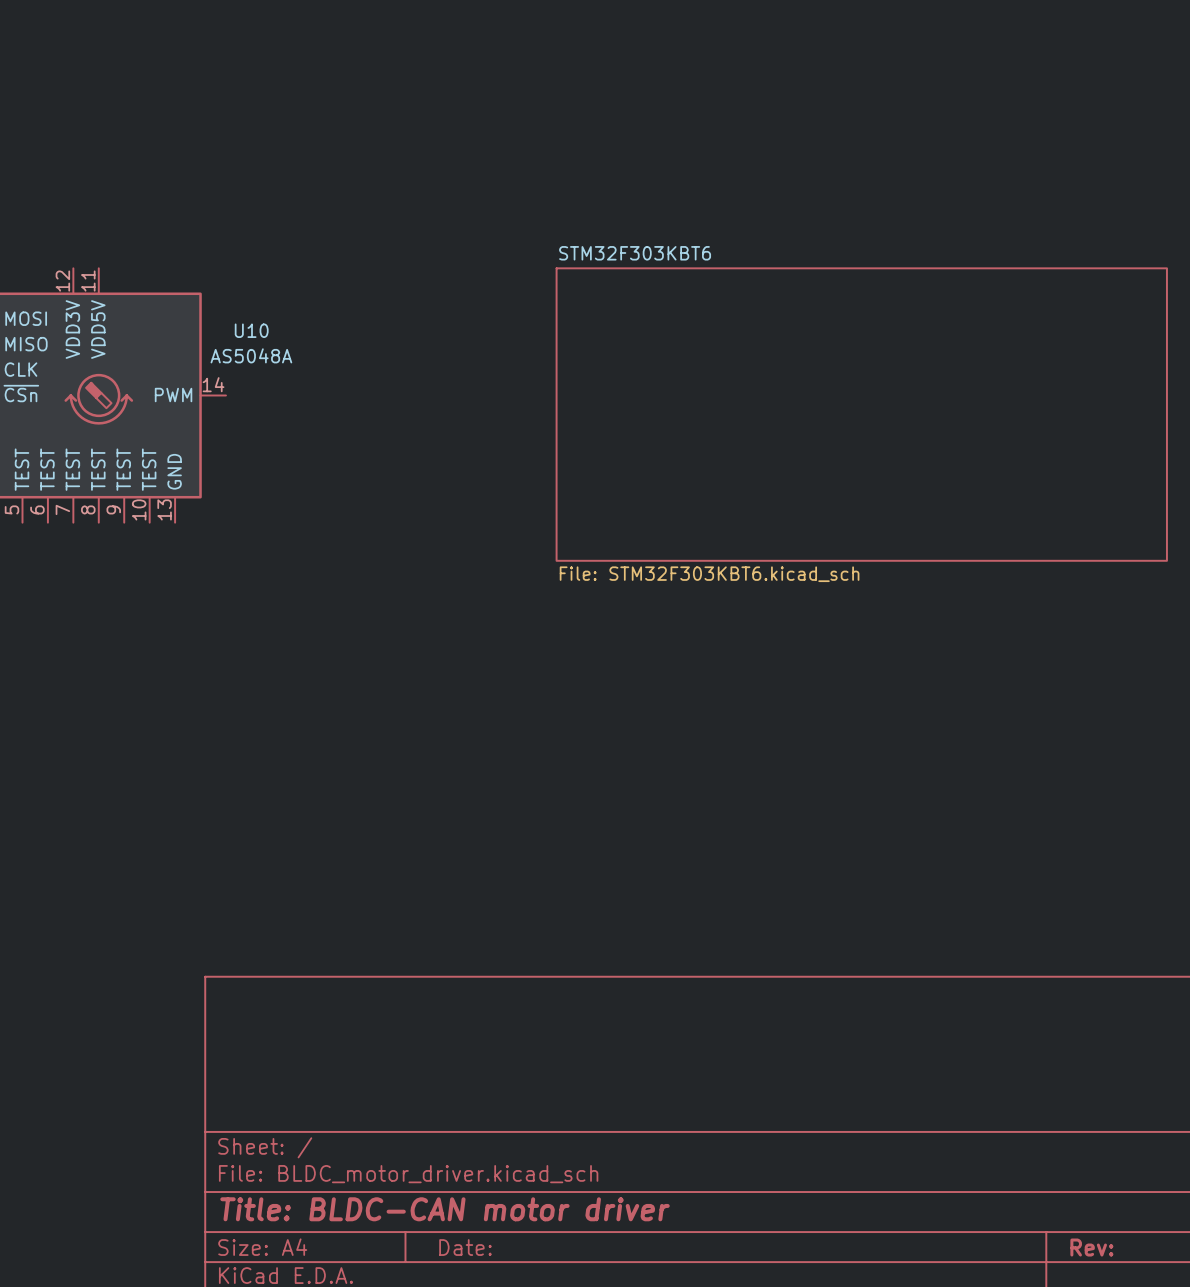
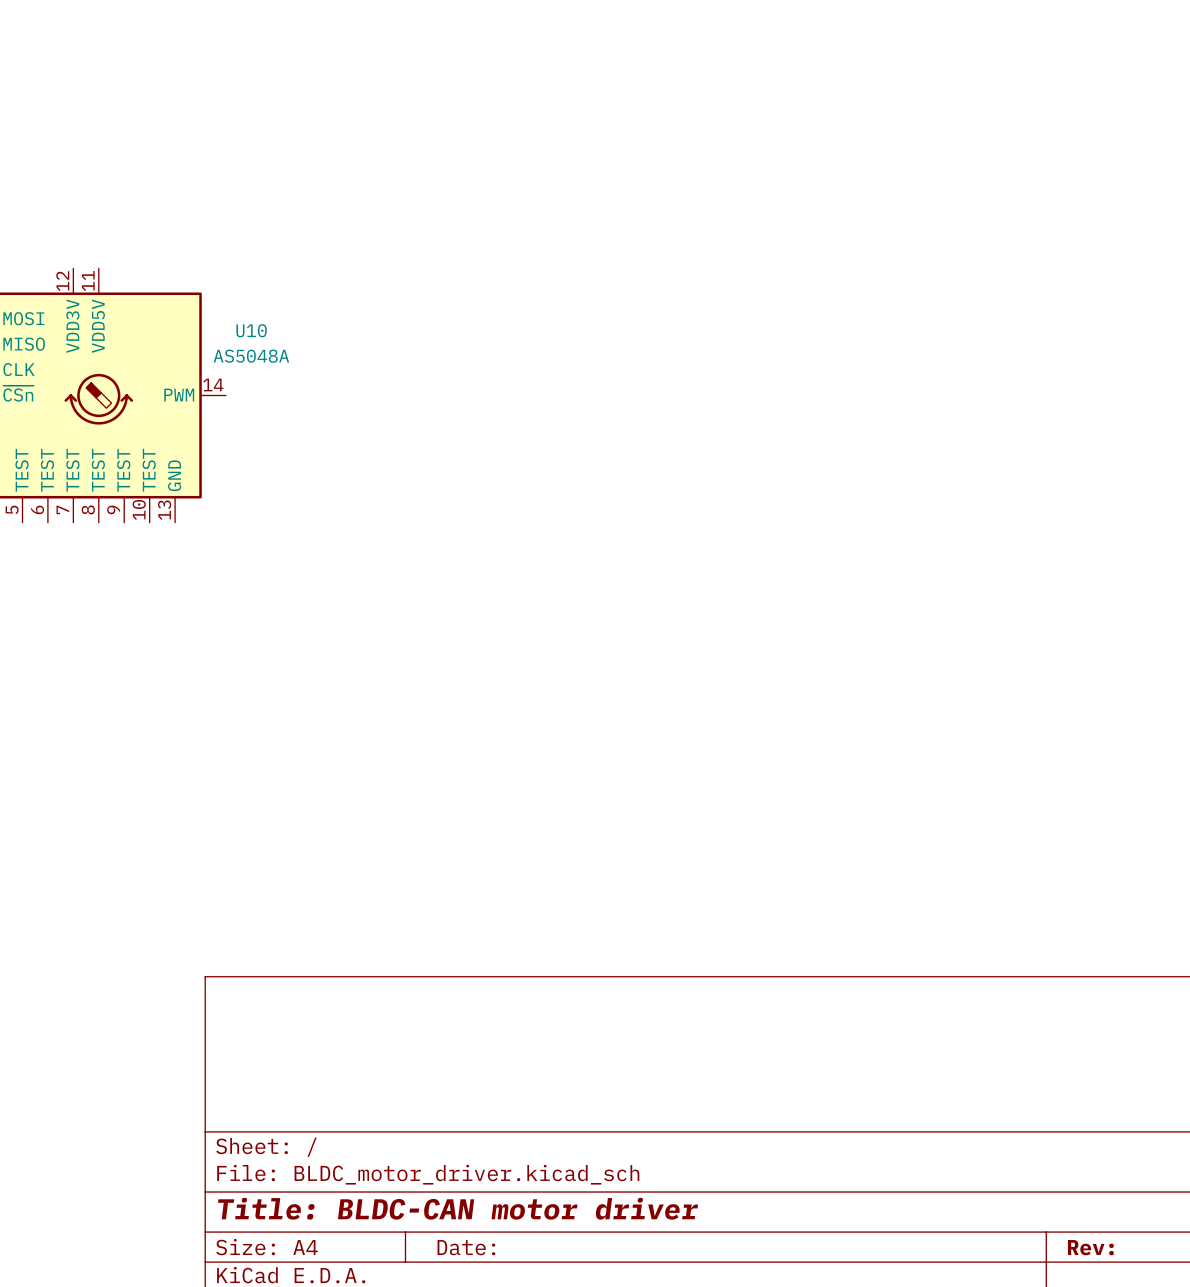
sheet STM32F303KBT6: File: STM32F303KBT6.kicad_sch (861, 414) -> none

